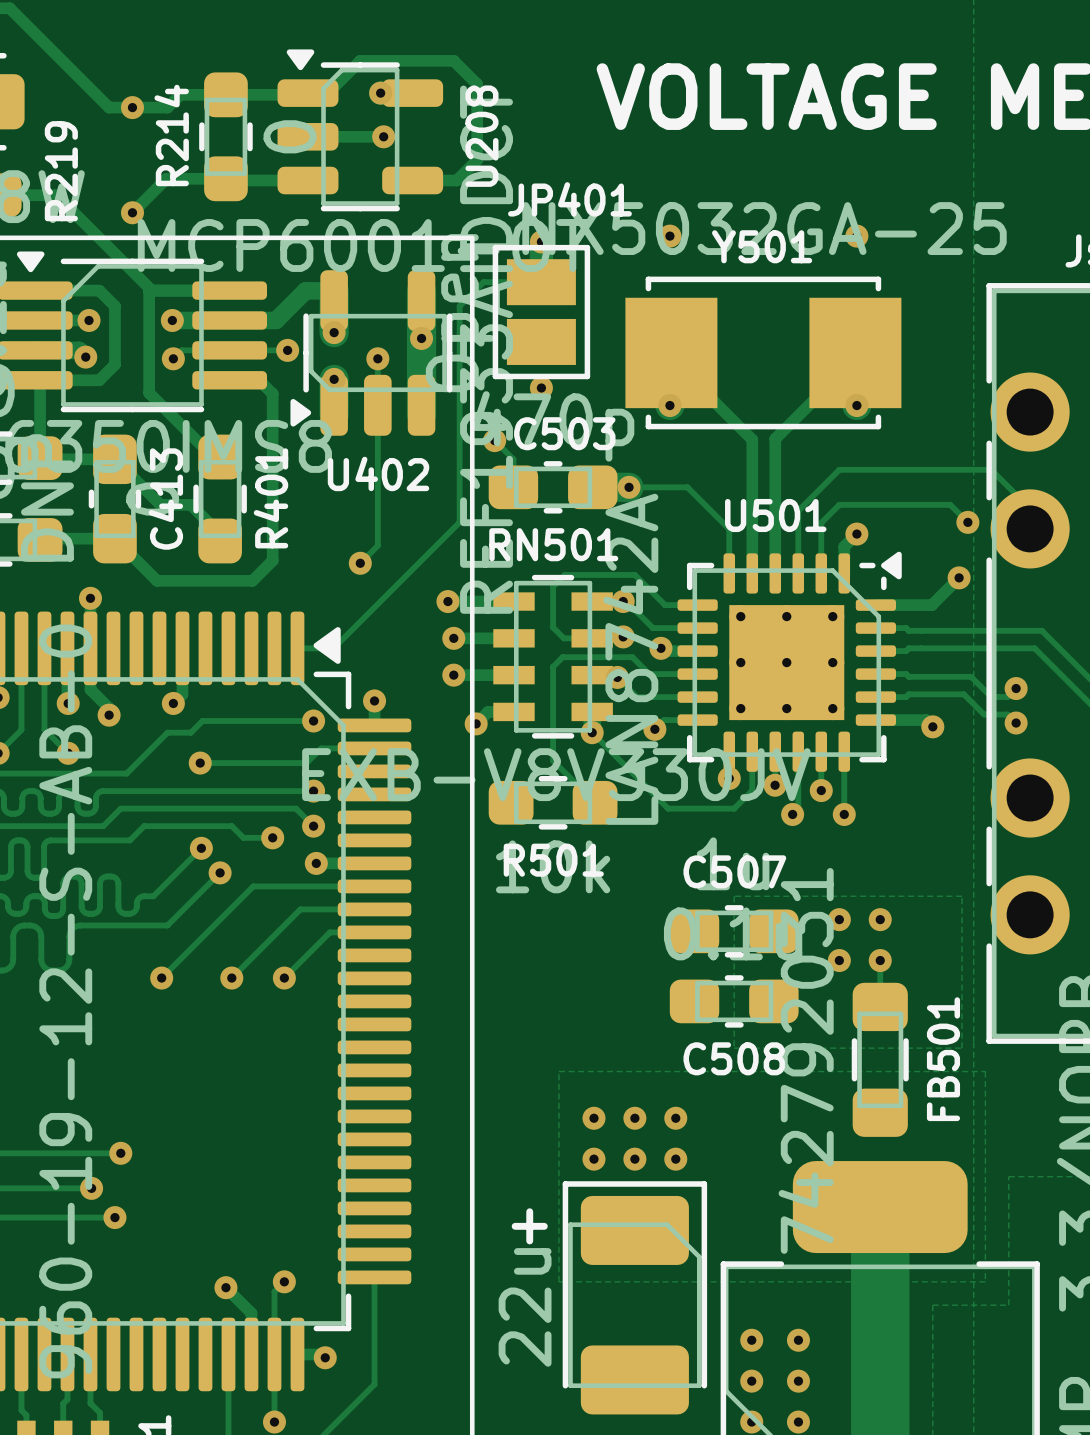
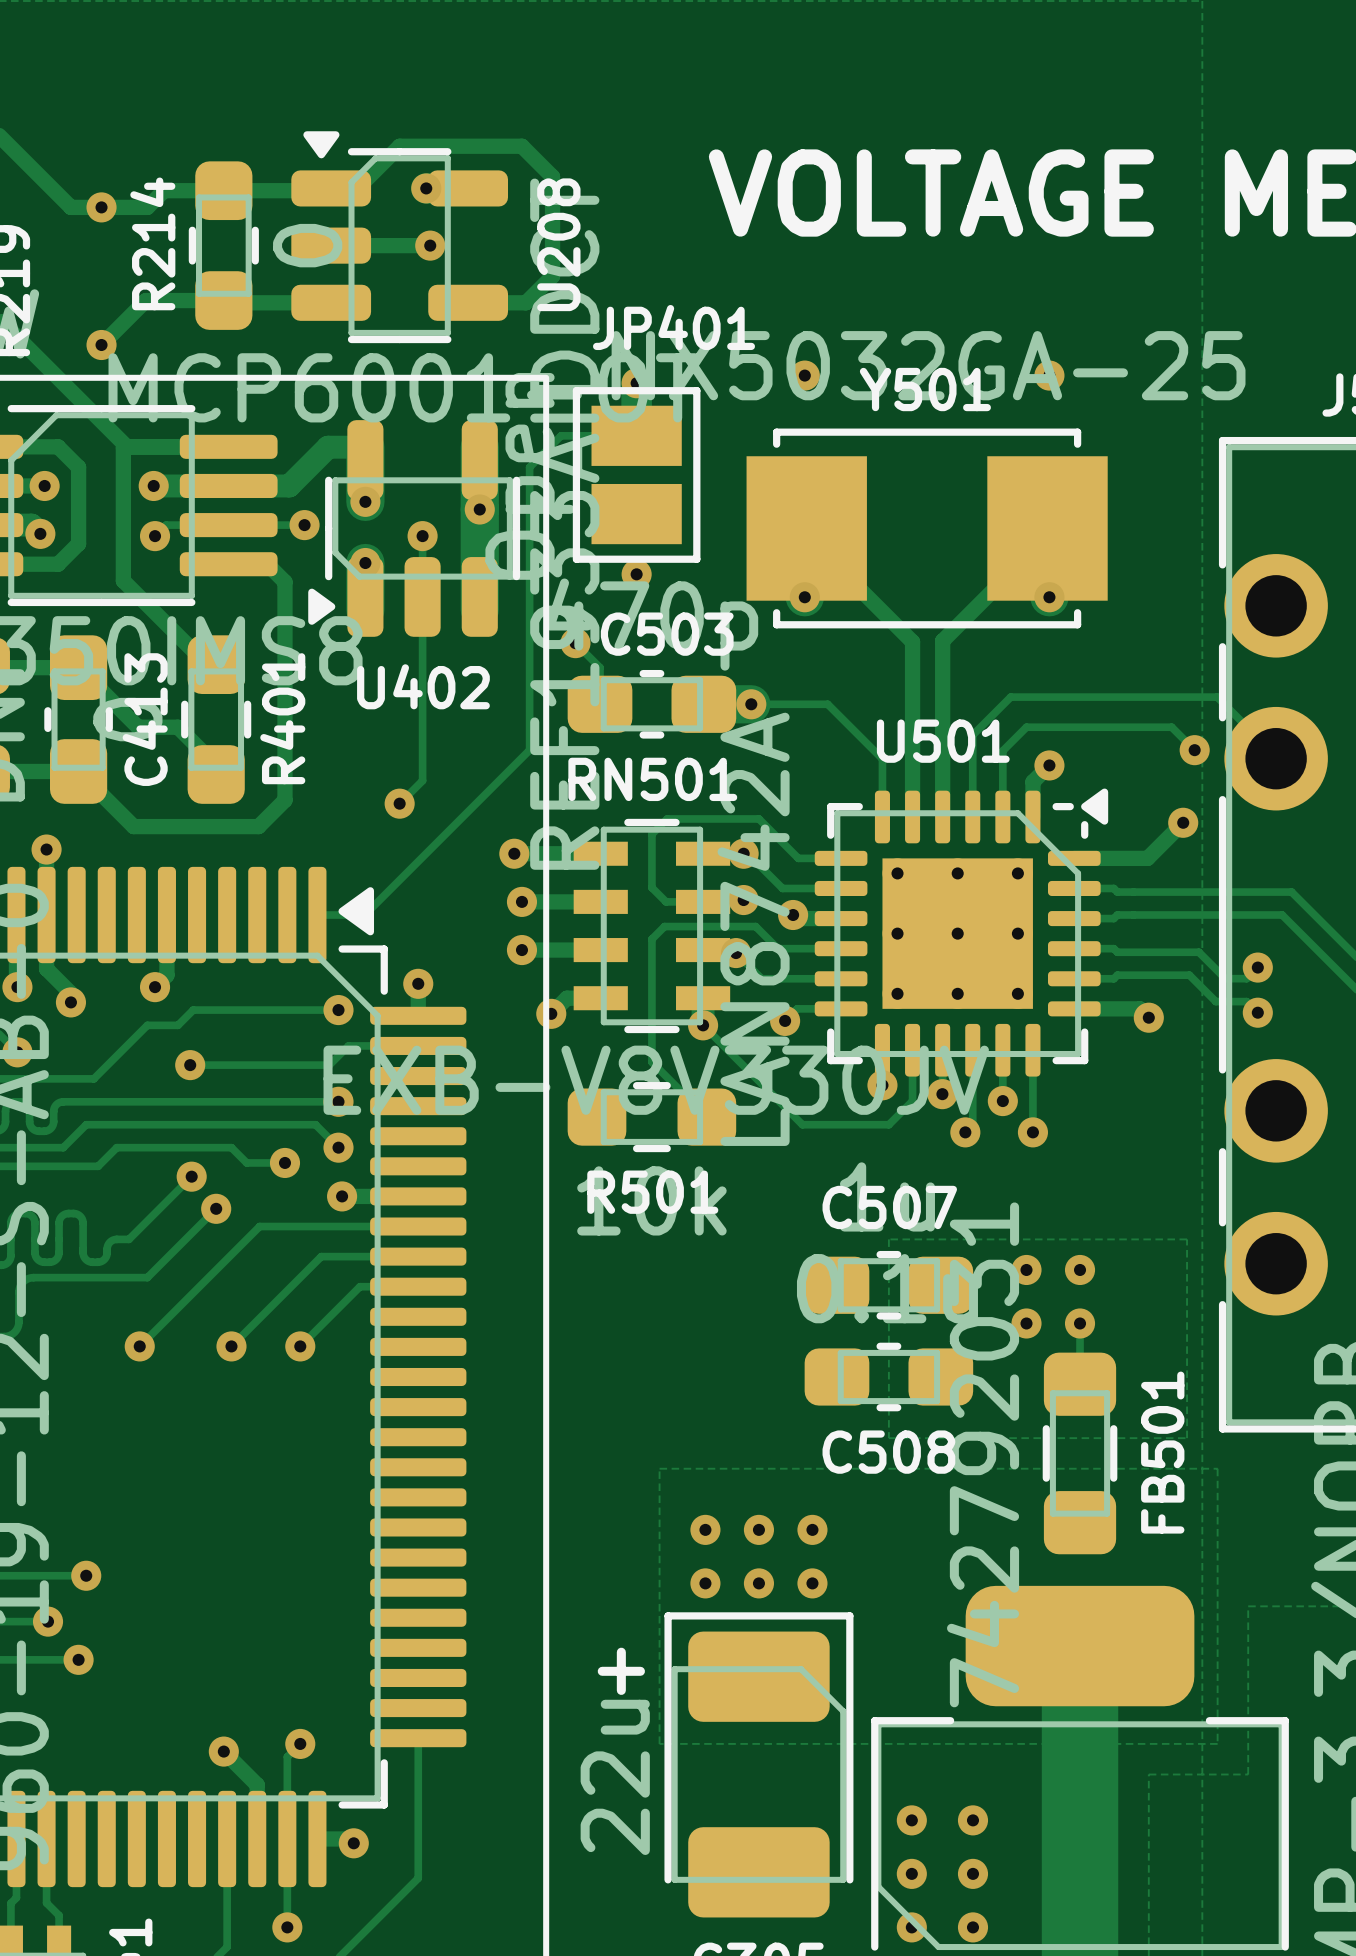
track: (827, 481) (839, 469) (991, 469) (1030, 508) (1030, 528) -> (1010, 697) (1217, 697) (1285, 765)

